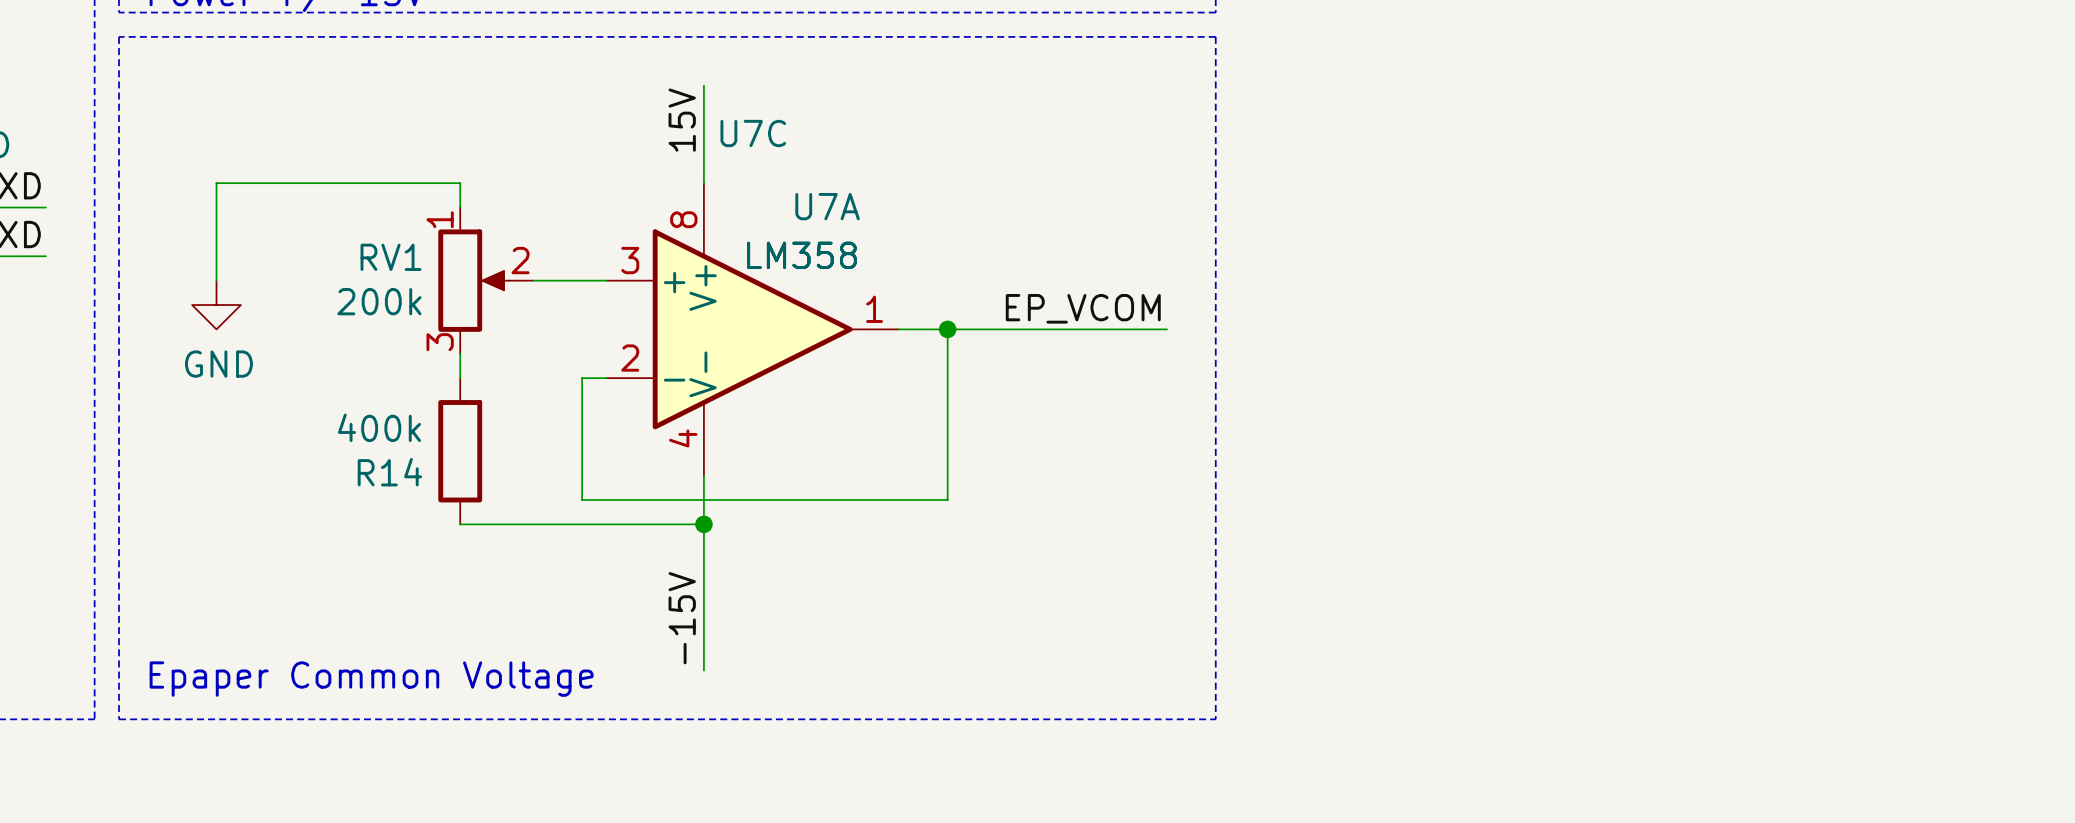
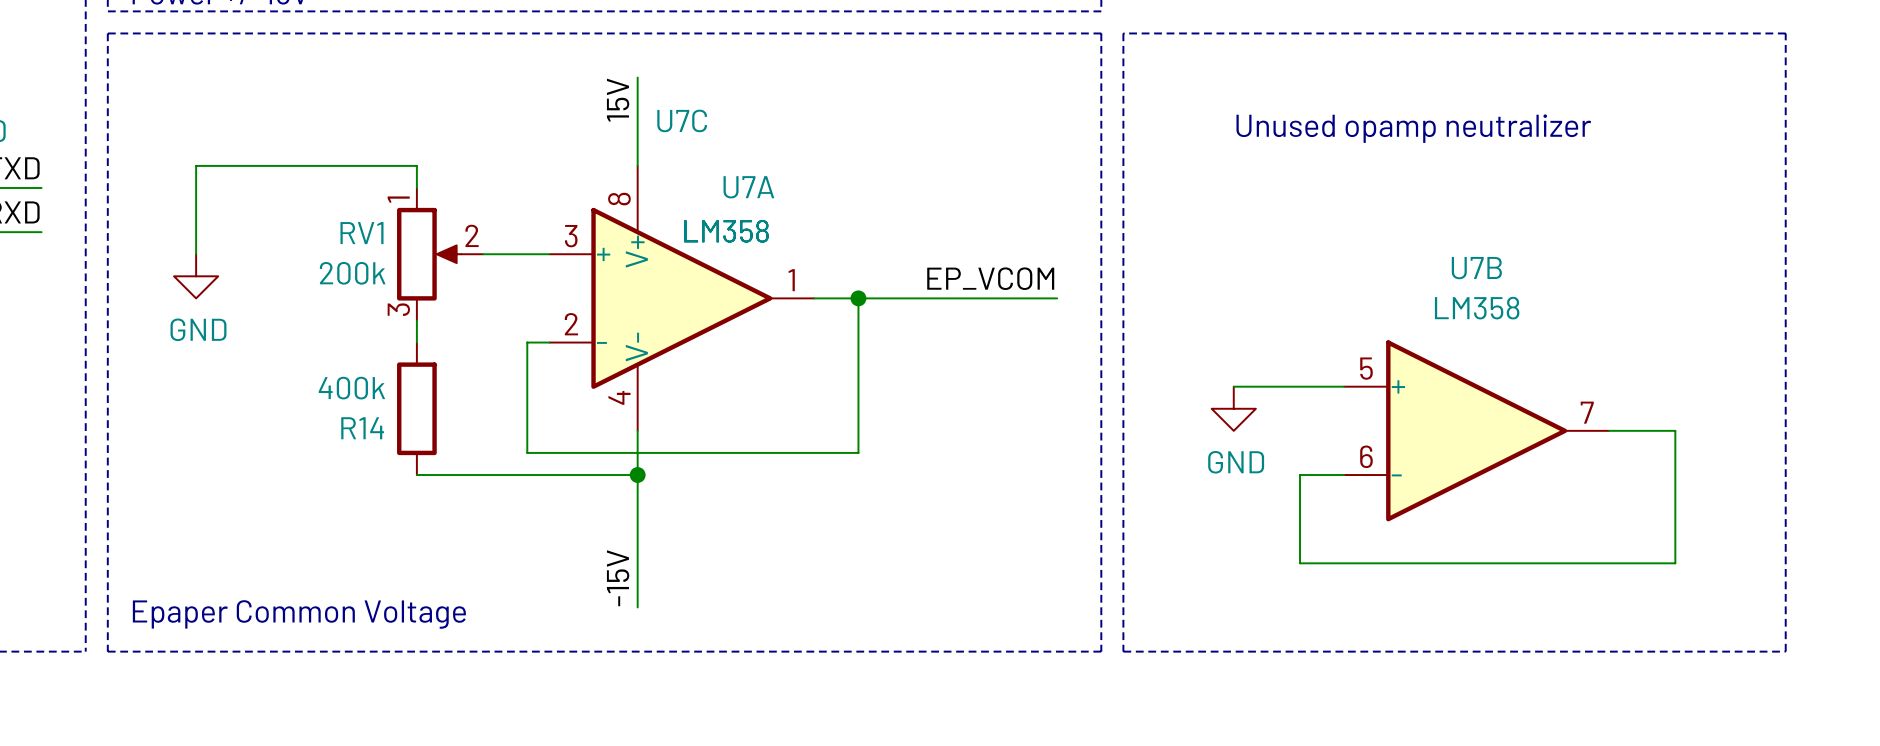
line: none -> (1123, 33) (1123, 651) (1785, 651) (1785, 33) (1123, 33)
text: none -> Unused opamp neutralizer (1413, 128)
wire: none -> (1233, 386) (1344, 386)
power symbol: none -> GND (1233, 408)
U7B: none -> LM358 (1476, 430)
wire: none -> (1609, 430) (1675, 430) (1675, 563) (1300, 563) (1300, 475) (1344, 475)

